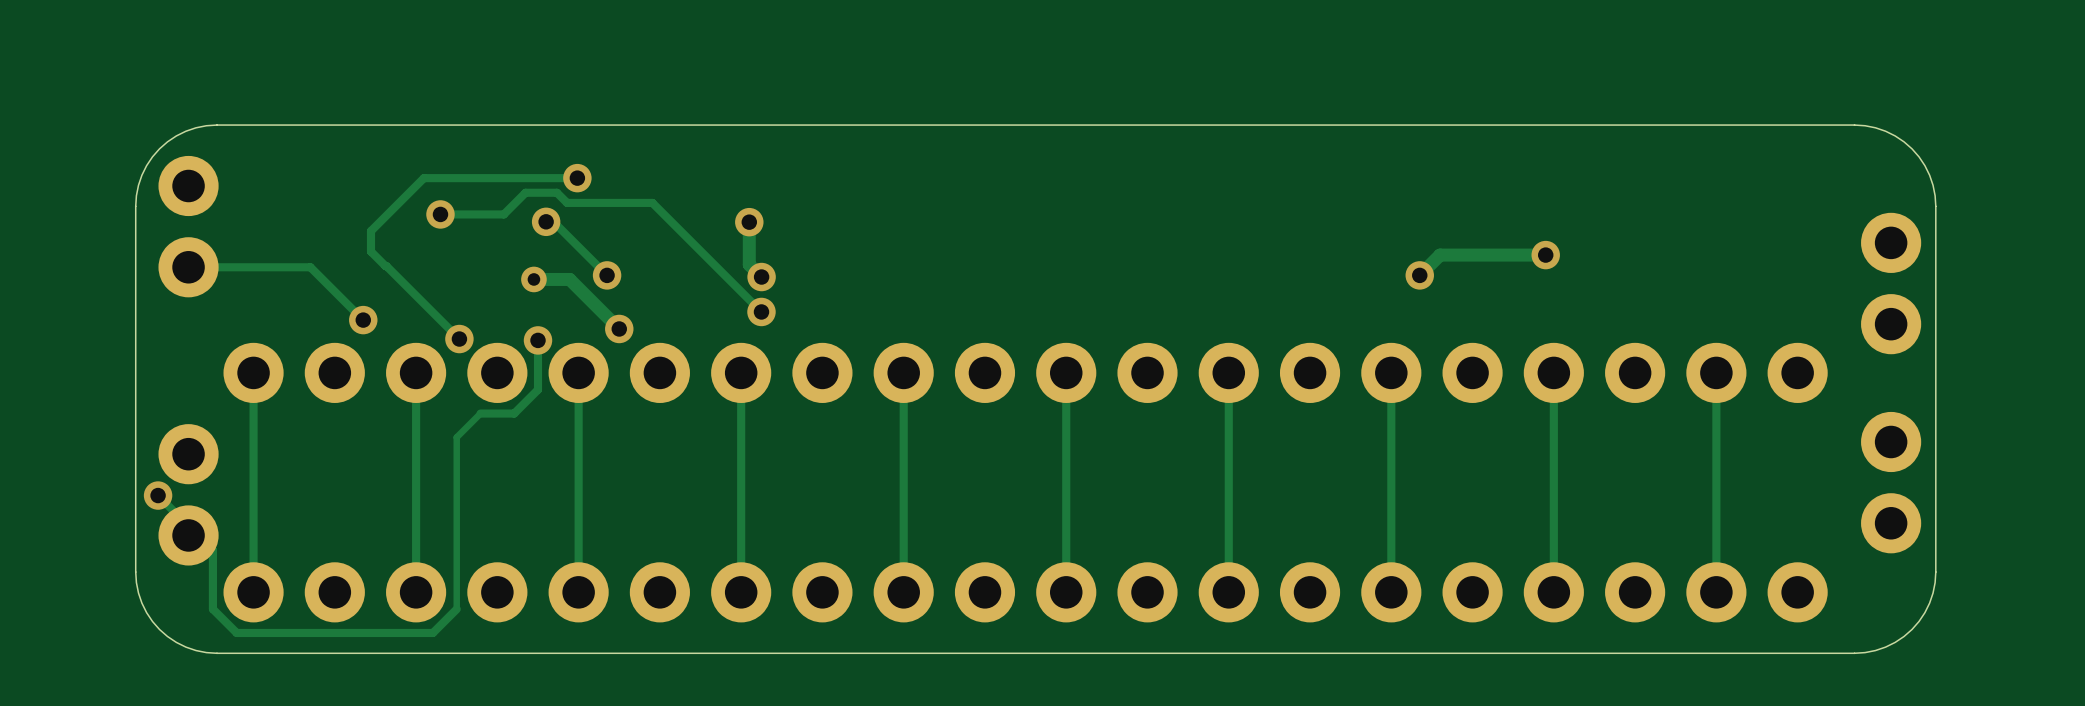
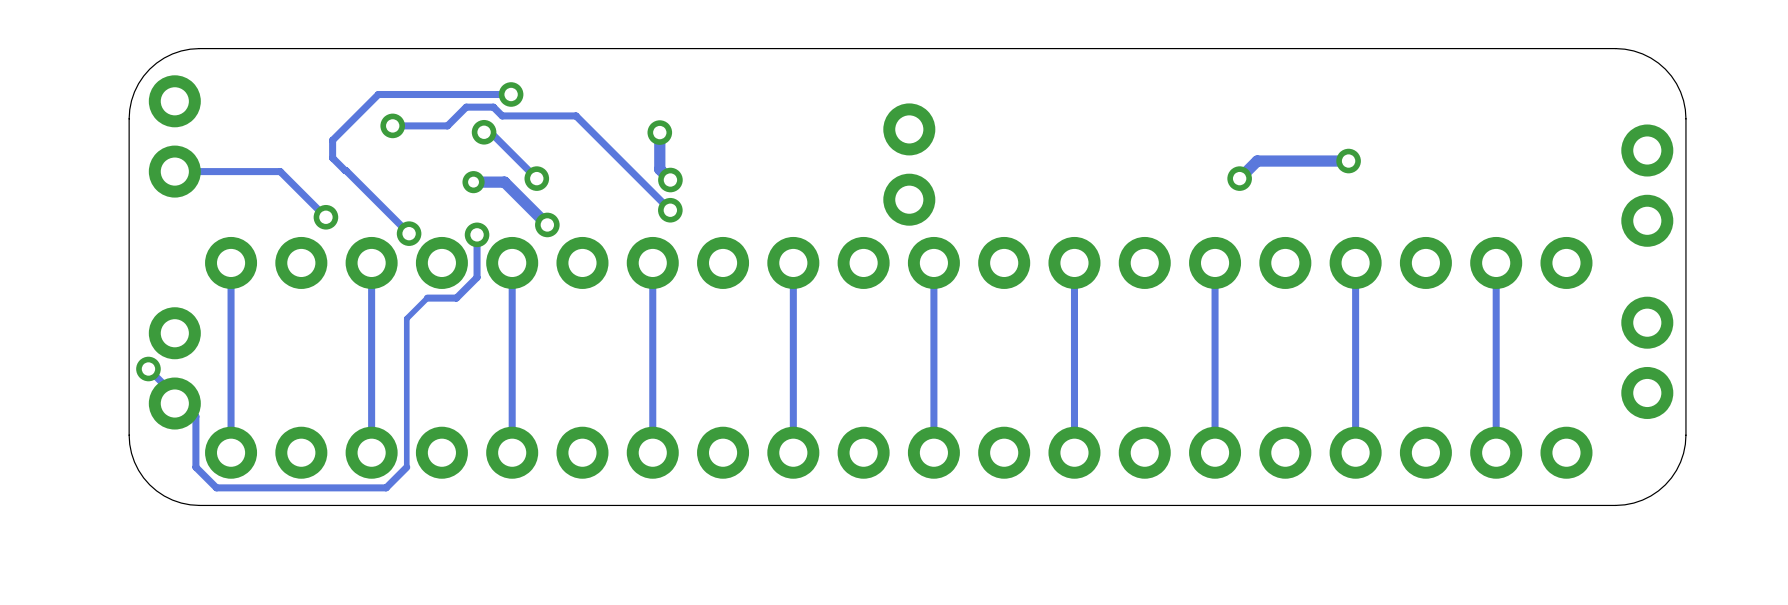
part: none -> (909, 164)

